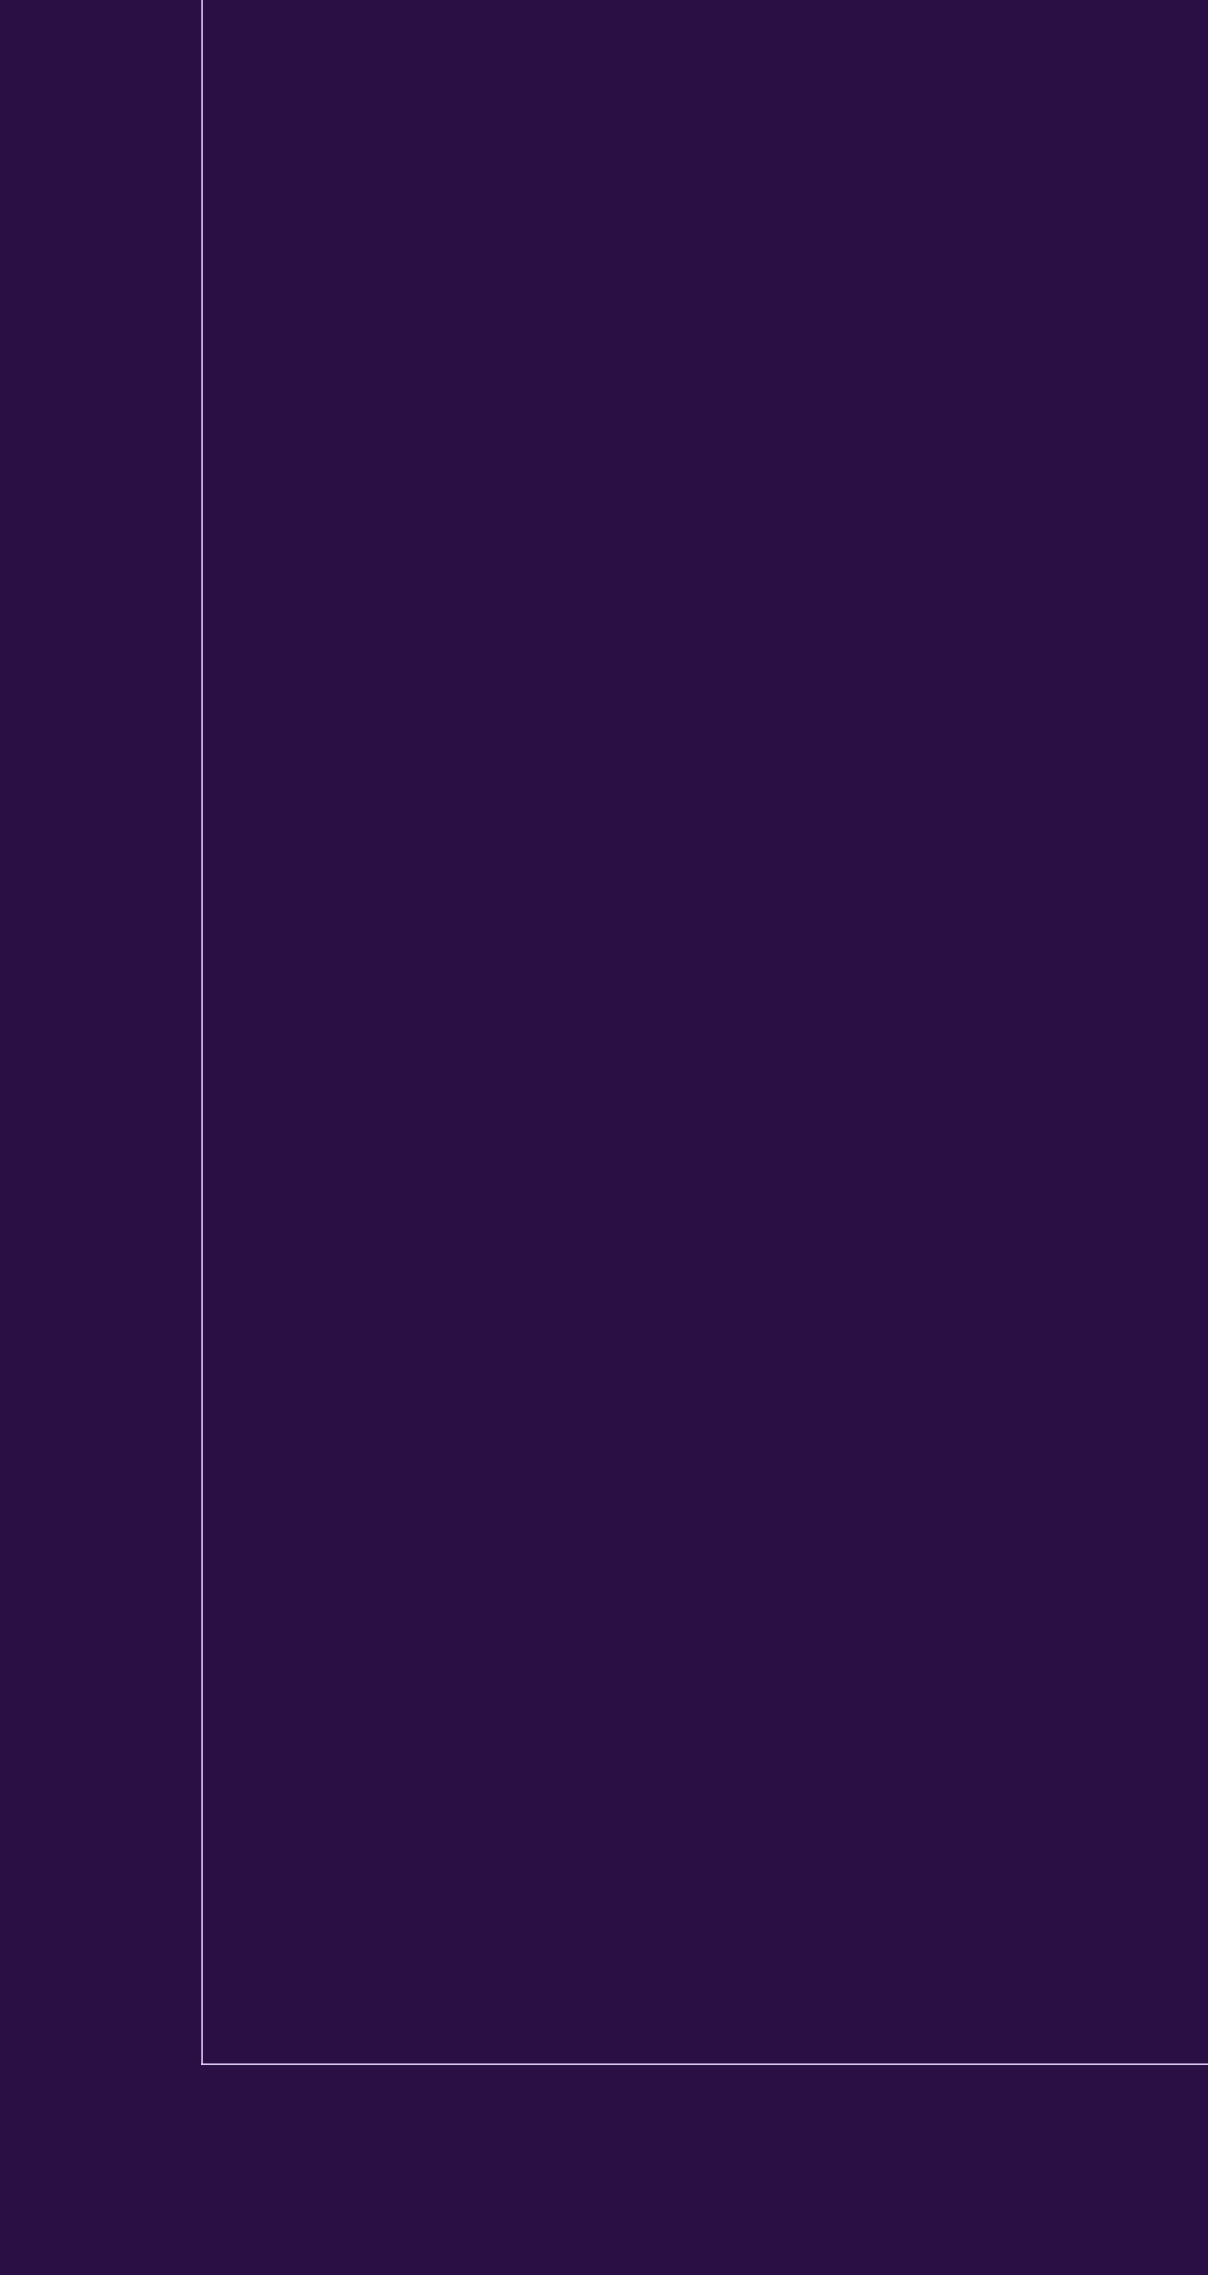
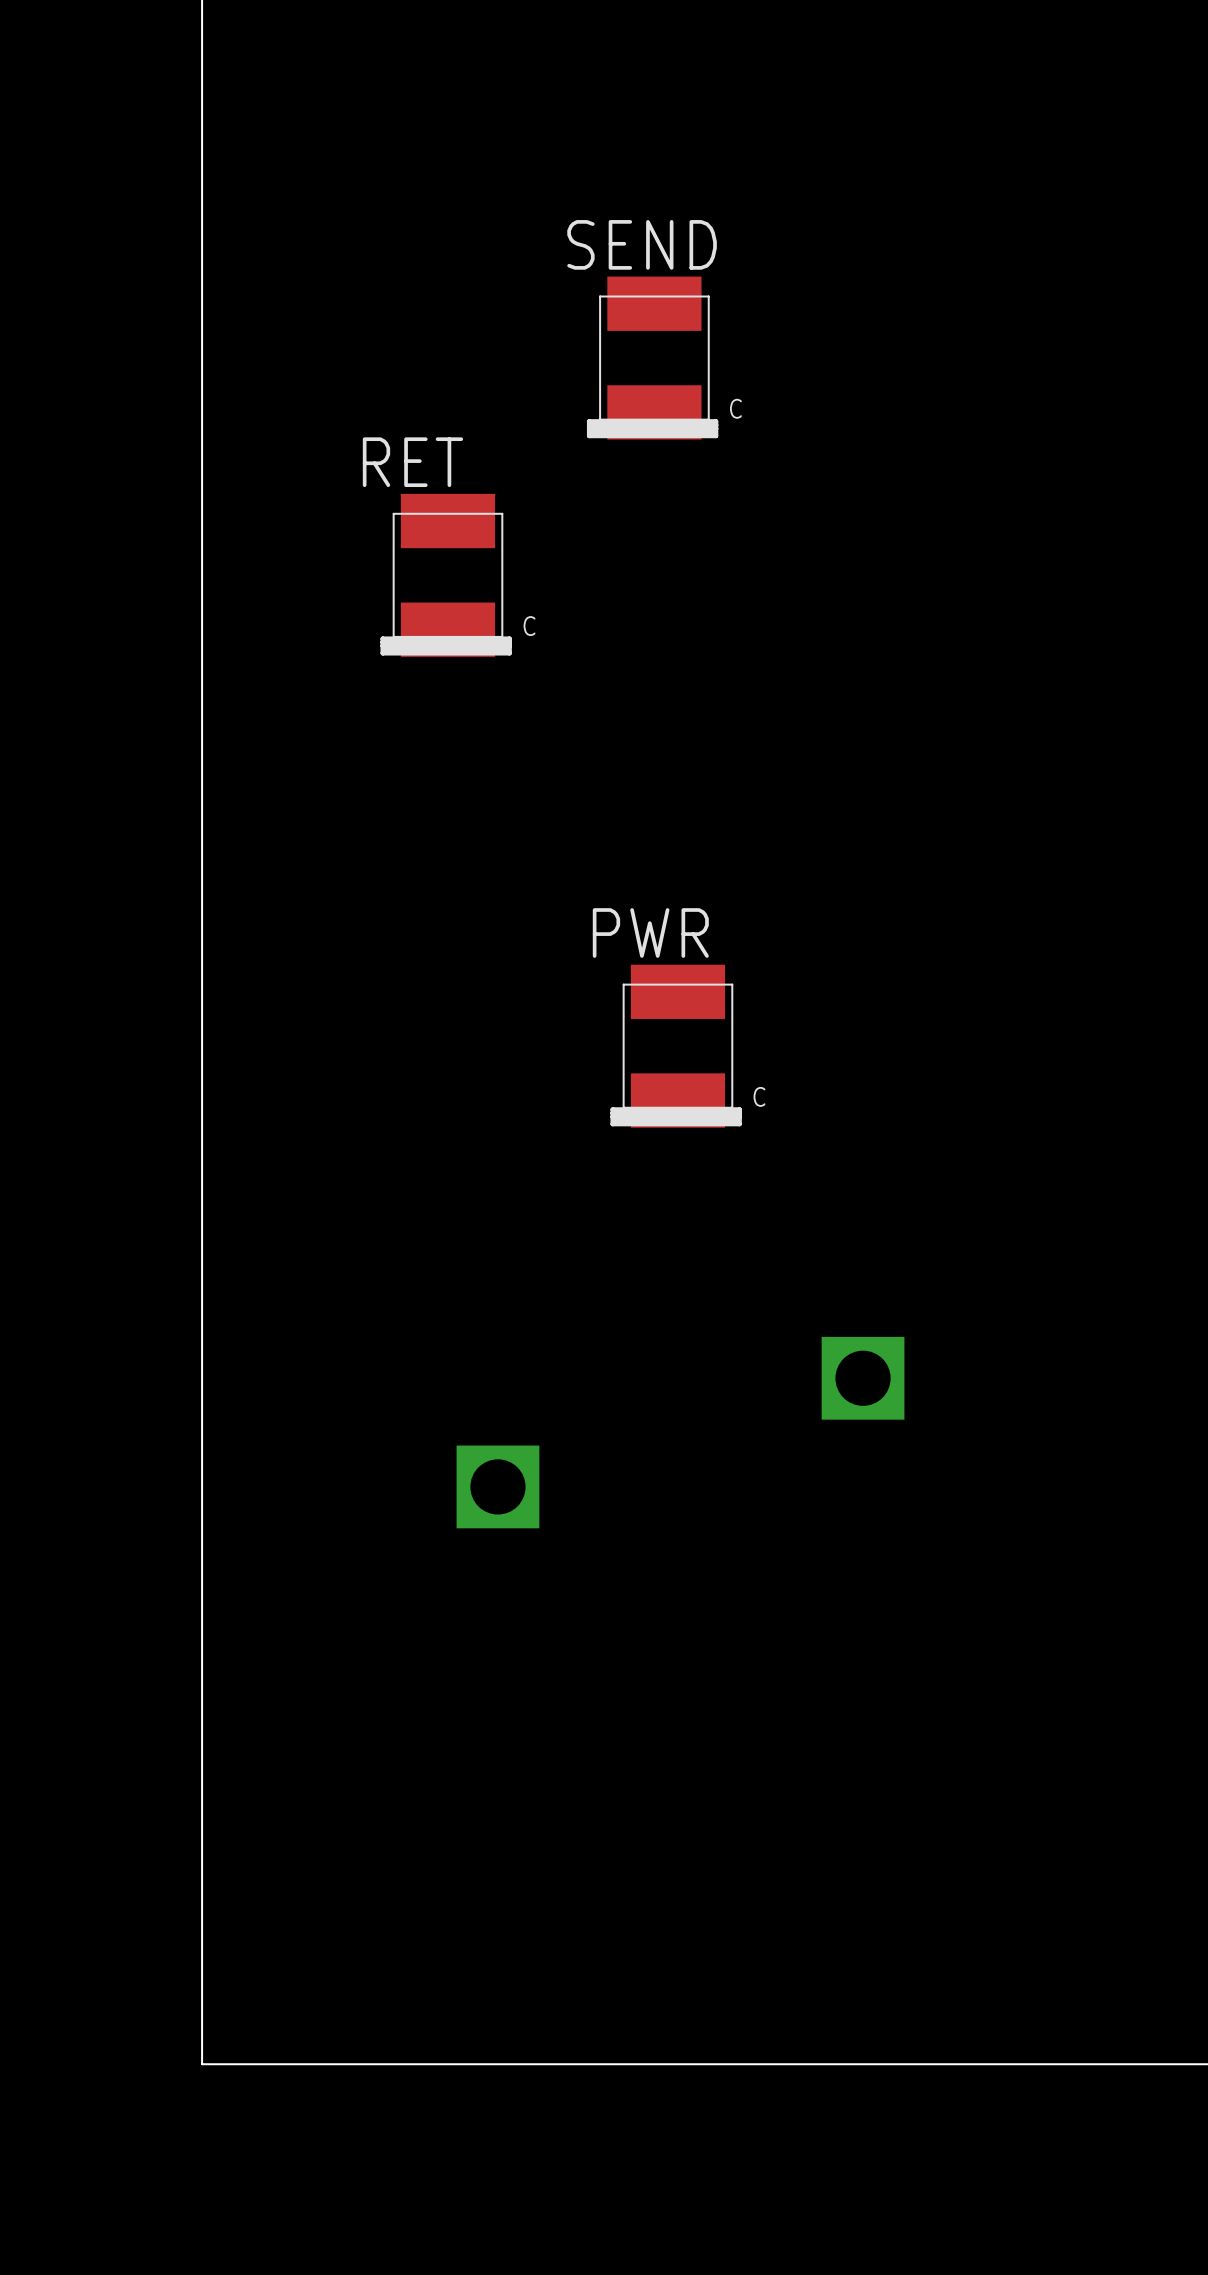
SEND: none -> (652, 358)
RET: none -> (446, 575)
PWR: none -> (676, 1046)
part: none -> (863, 1378)
part: none -> (497, 1486)

